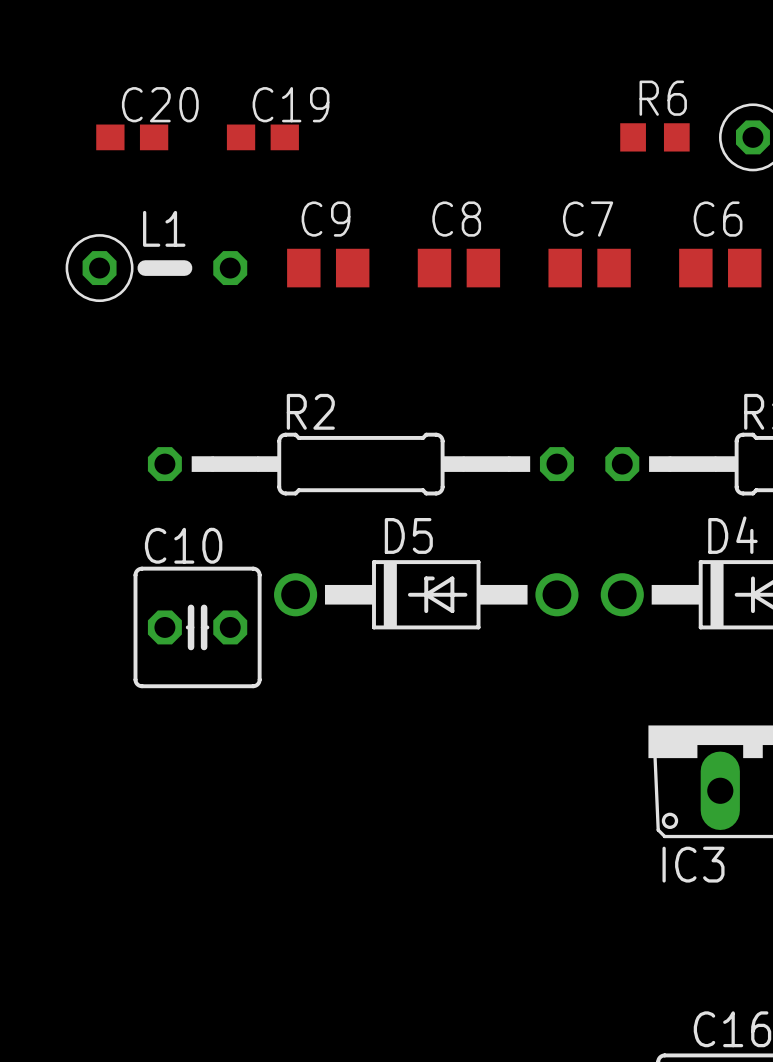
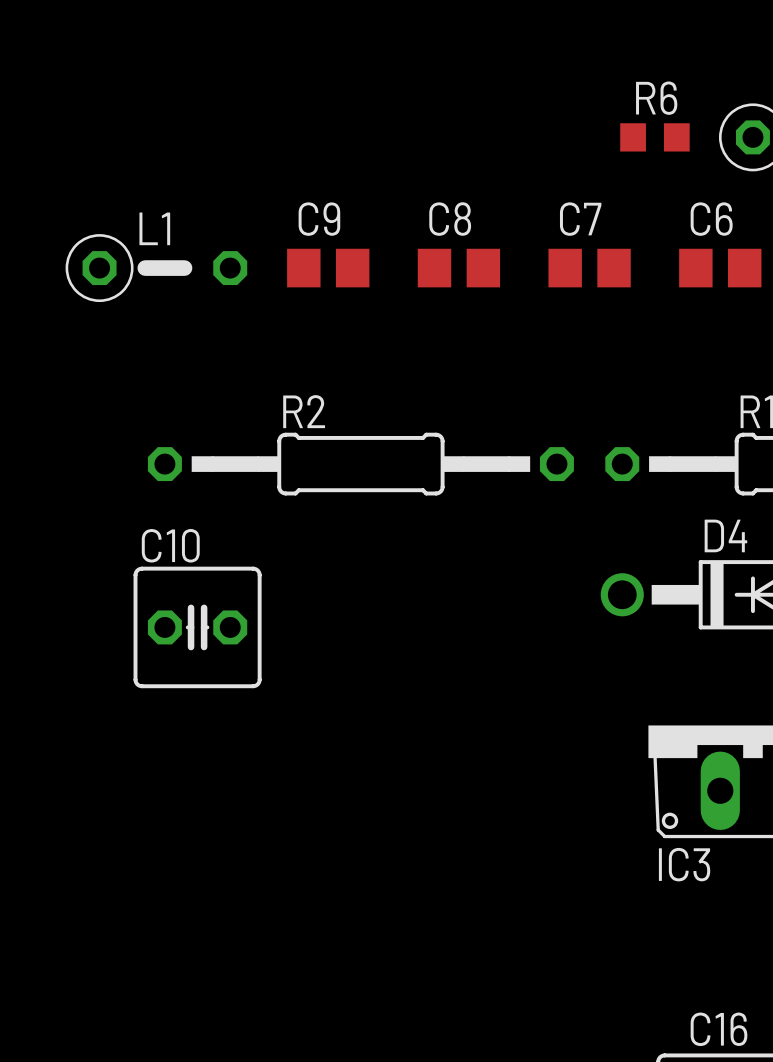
C20: (132, 137) -> none
C19: (262, 137) -> none
D5: (426, 594) -> none

